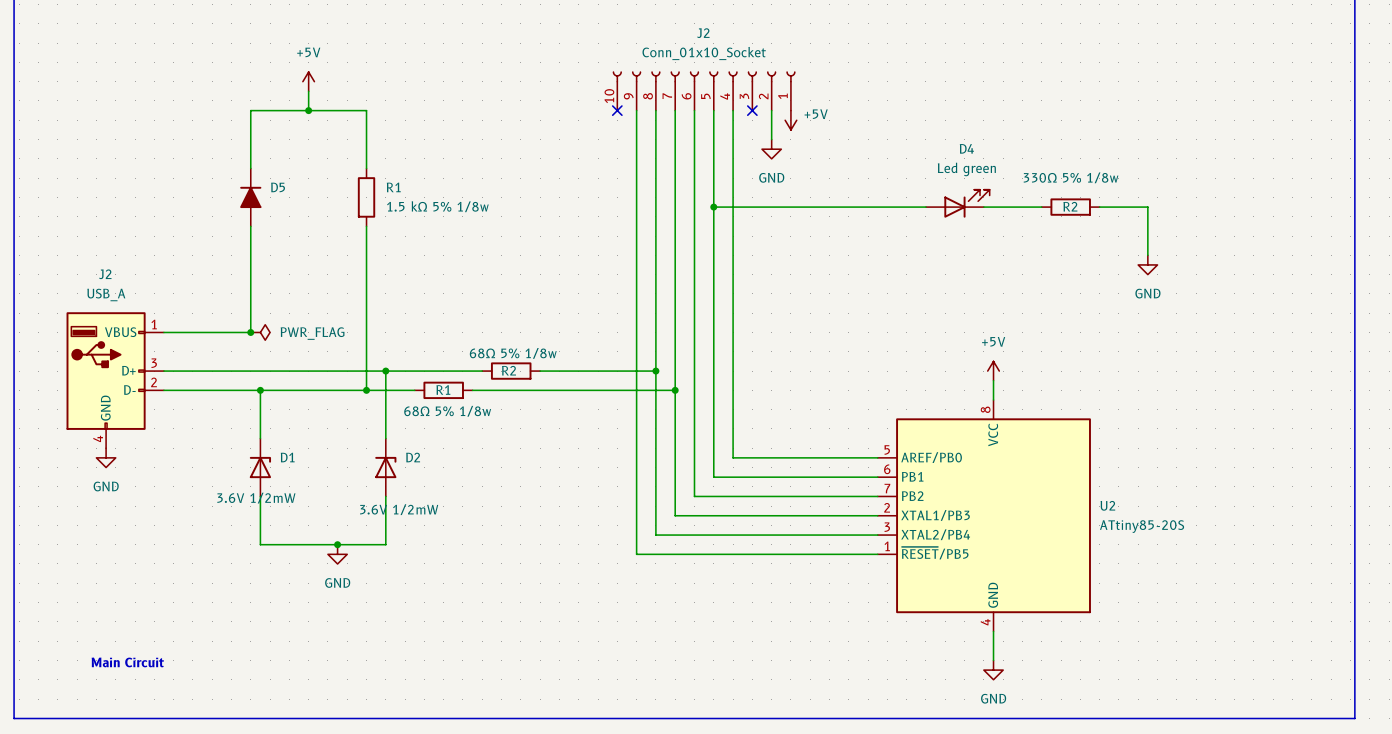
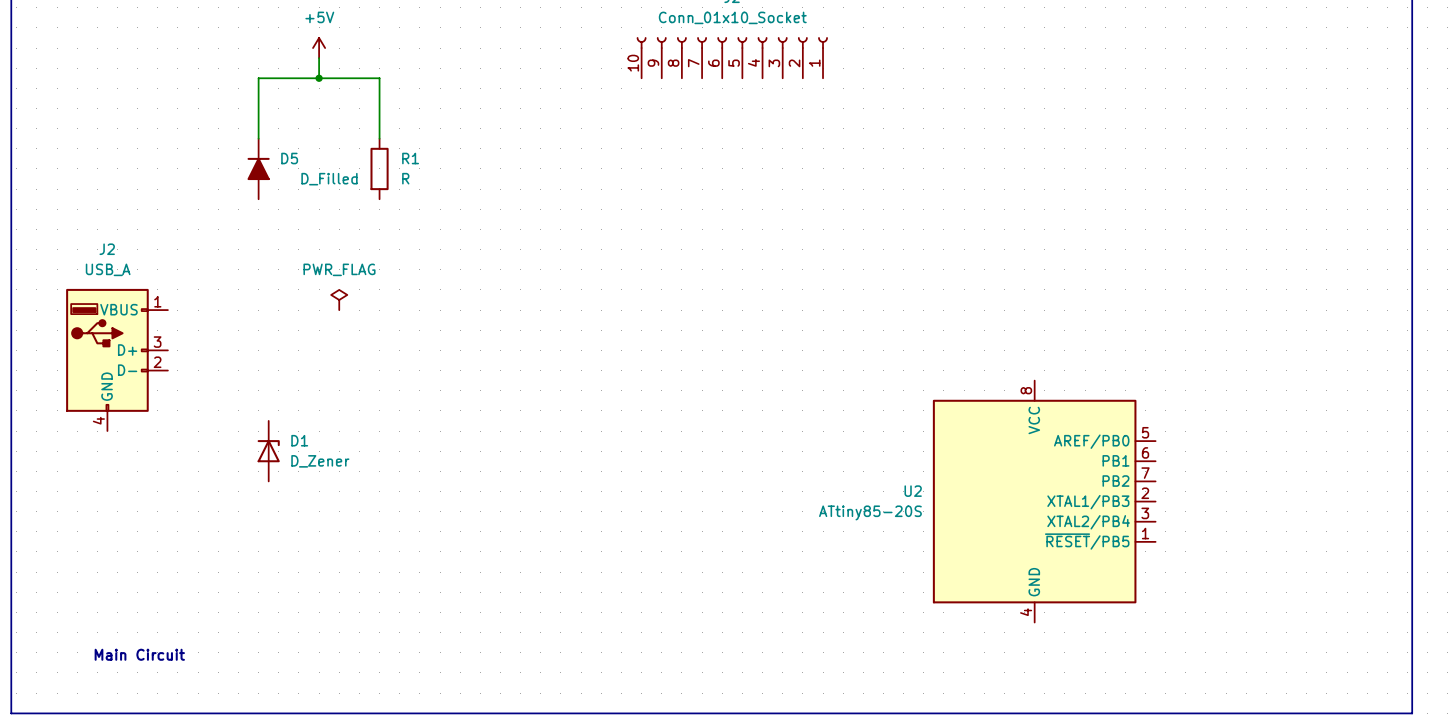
no-connect mark: (617, 110) -> none
wire: (636, 110) (636, 554) (877, 554) -> none
wire: (655, 110) (655, 535) (877, 535) -> none
wire: (675, 110) (675, 515) (877, 515) -> none
wire: (694, 110) (694, 496) (877, 496) -> none
wire: (713, 110) (713, 477) (877, 477) -> none
wire: (733, 110) (733, 457) (877, 457) -> none
no-connect mark: (752, 110) -> none
wire: (771, 110) (771, 139) -> none
power symbol: +5V (790, 120) -> none
power symbol: GND (771, 149) -> none
D4: Led green (957, 203) -> none
R1 value: 1.5 kΩ 5% 1/8w (437, 206) -> R (405, 178)
D5 value: none -> D_Filled (329, 179)
wire: (713, 207) (925, 207) -> none
junction: (713, 207) -> none
wire: (983, 207) (1041, 207) -> none
R2: 330Ω 5% 1/8w (1070, 207) -> none
wire: (1099, 207) (1147, 207) (1147, 255) -> none
wire: (250, 226) (250, 332) (163, 332) -> none
wire: (366, 226) (366, 390) -> none
power symbol: GND (1147, 264) -> none
junction: (250, 332) -> none
power symbol rotation: 0° (260, 332) -> 90° counterclockwise (339, 299)
power symbol position: PWR_FLAG (260, 332) -> PWR_FLAG (339, 299)
power symbol text position: PWR_FLAG (312, 333) -> PWR_FLAG (339, 269)
wire: (163, 371) (482, 371) -> none
wire: (385, 371) (385, 438) -> none
junction: (385, 371) -> none
R2: 68Ω 5% 1/8w (511, 371) -> none
wire: (540, 371) (655, 371) -> none
junction: (655, 371) -> none
power symbol: +5V (993, 371) -> none
wire: (993, 380) (993, 400) -> none
wire: (163, 390) (414, 390) -> none
wire: (260, 390) (260, 438) -> none
junction: (260, 390) -> none
junction: (366, 390) -> none
R1: 68Ω 5% 1/8w (443, 390) -> none
wire: (472, 390) (675, 390) -> none
junction: (675, 390) -> none
power symbol: GND (106, 457) -> none
D2: 3.6V 1/2mW (385, 467) -> none
wire: (260, 496) (260, 544) (385, 544) (385, 496) -> none
D1 value: 3.6V 1/2mW (256, 498) -> D_Zener (320, 461)
U2 flip: as is (993, 515) -> left-right (1034, 501)
junction: (337, 544) -> none
power symbol: GND (337, 554) -> none
wire: (993, 631) (993, 660) -> none
power symbol: GND (993, 670) -> none

